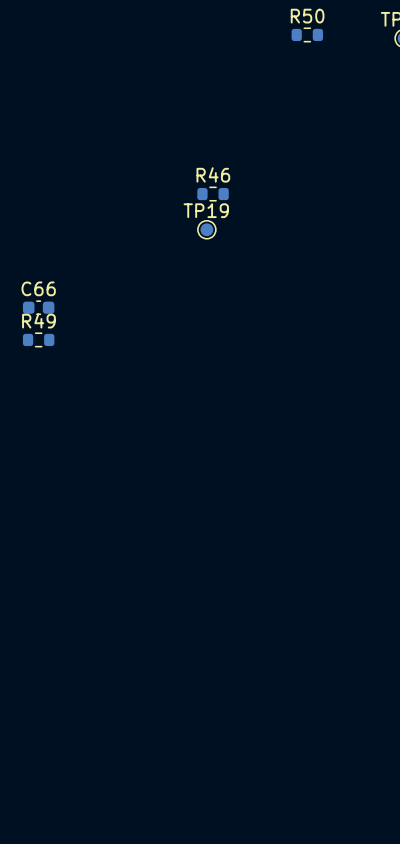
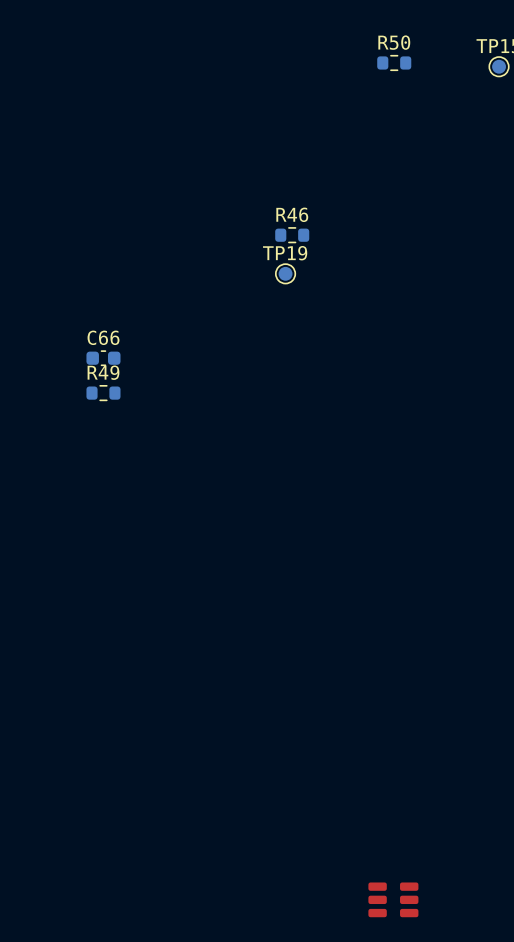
part: none -> (393, 899)

